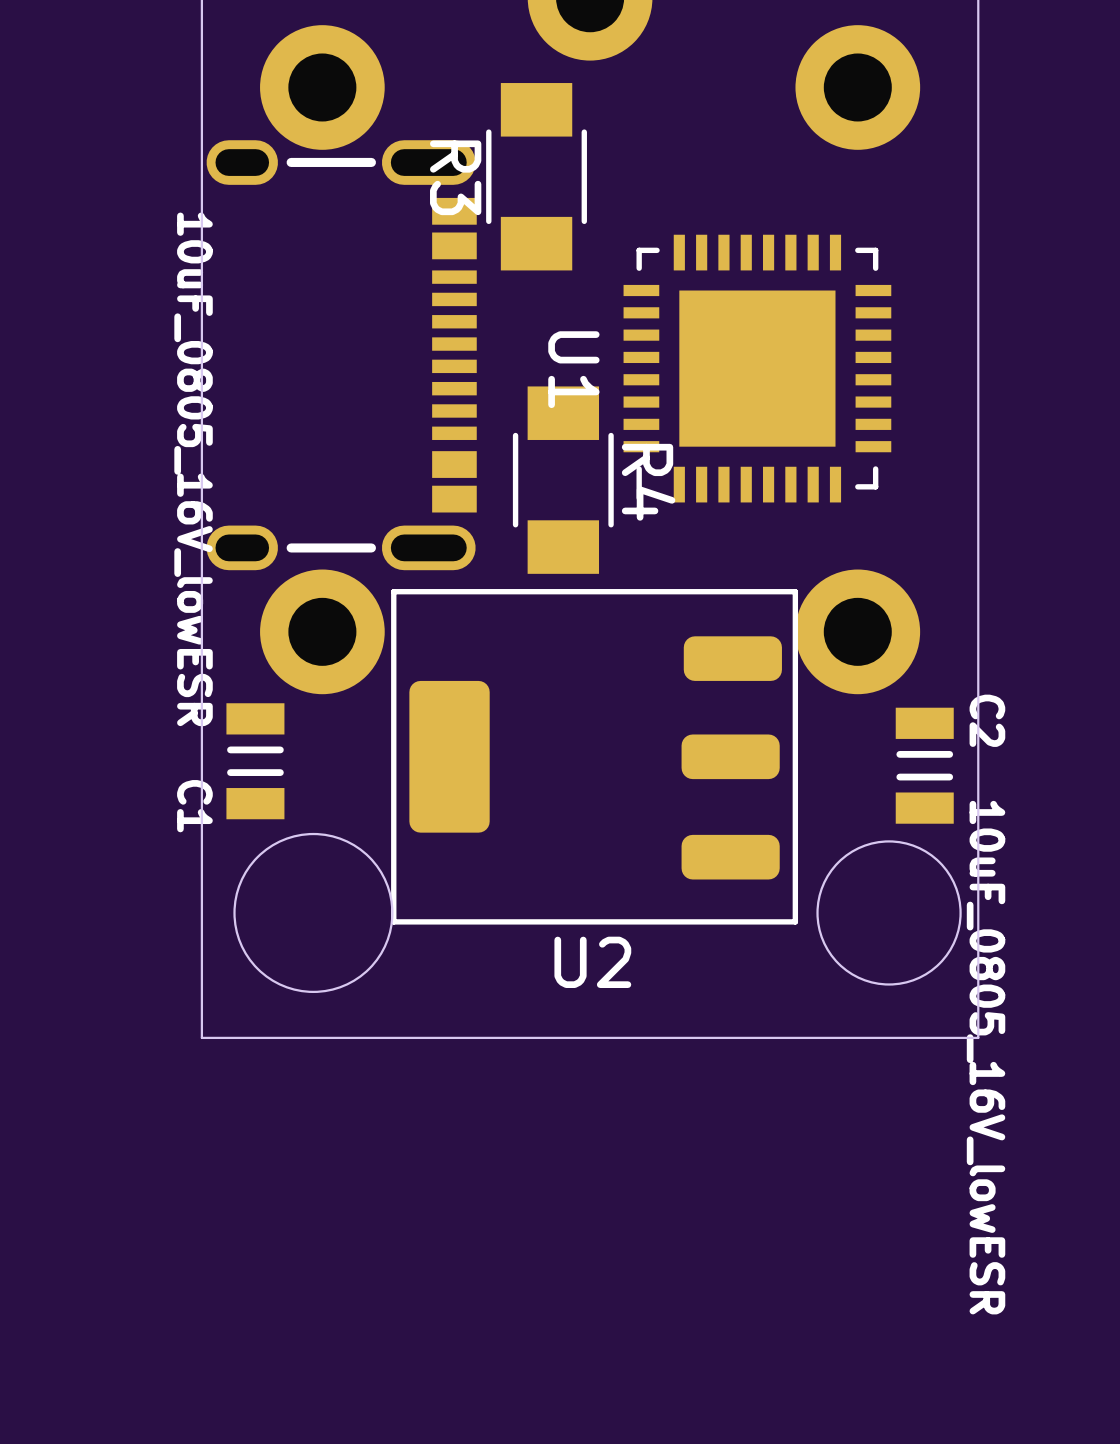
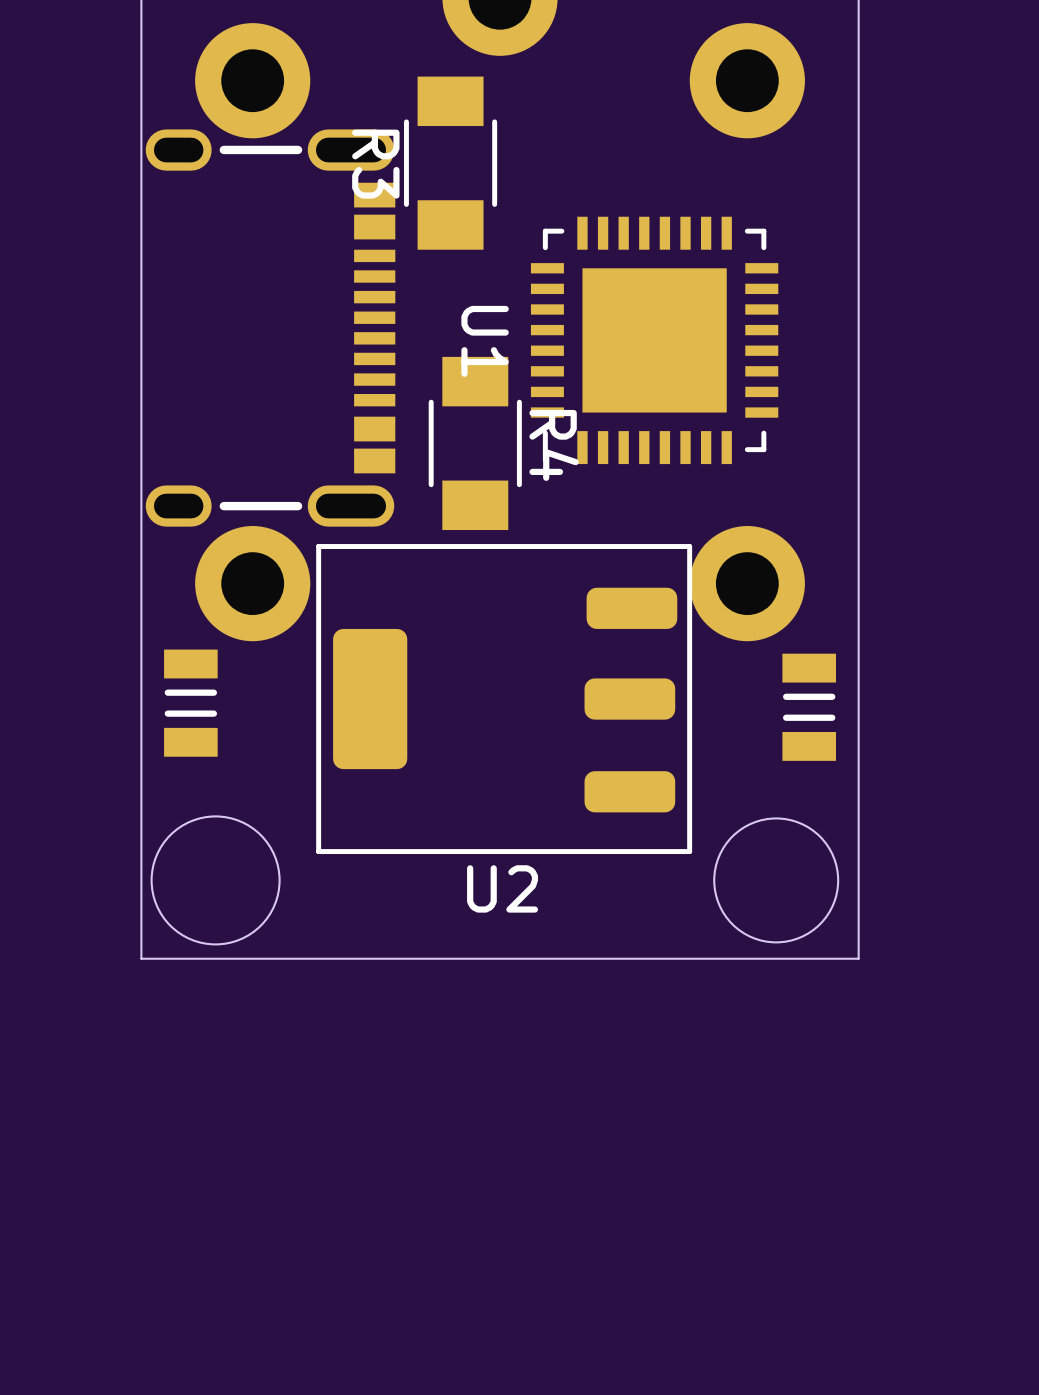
C1 value: 10uF_0805_16V_lowESR (193, 469) -> none
C2 name: C2 (987, 720) -> none
C1 name: C1 (194, 806) -> none
round board edge: [233, 832, 394, 994] -> none
round board edge: none -> [150, 815, 281, 946]
round board edge position: (889, 912) -> (776, 880)
C2 value: 10uF_0805_16V_lowESR (986, 1057) -> none

